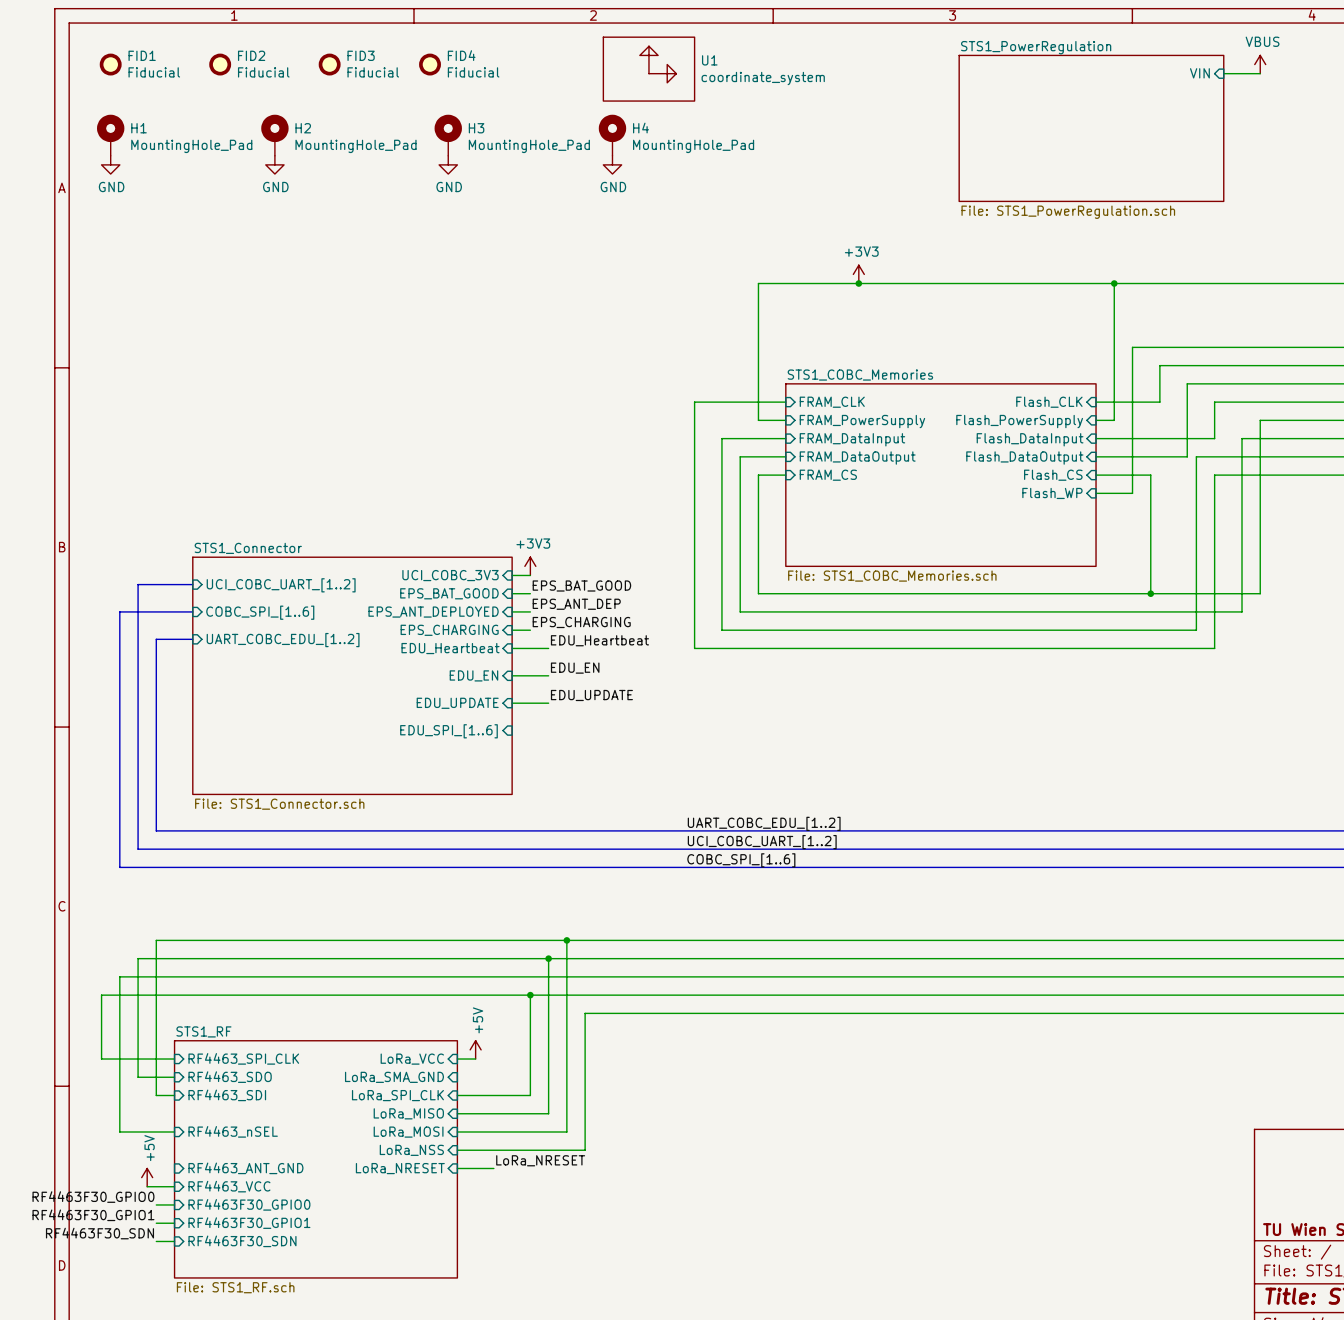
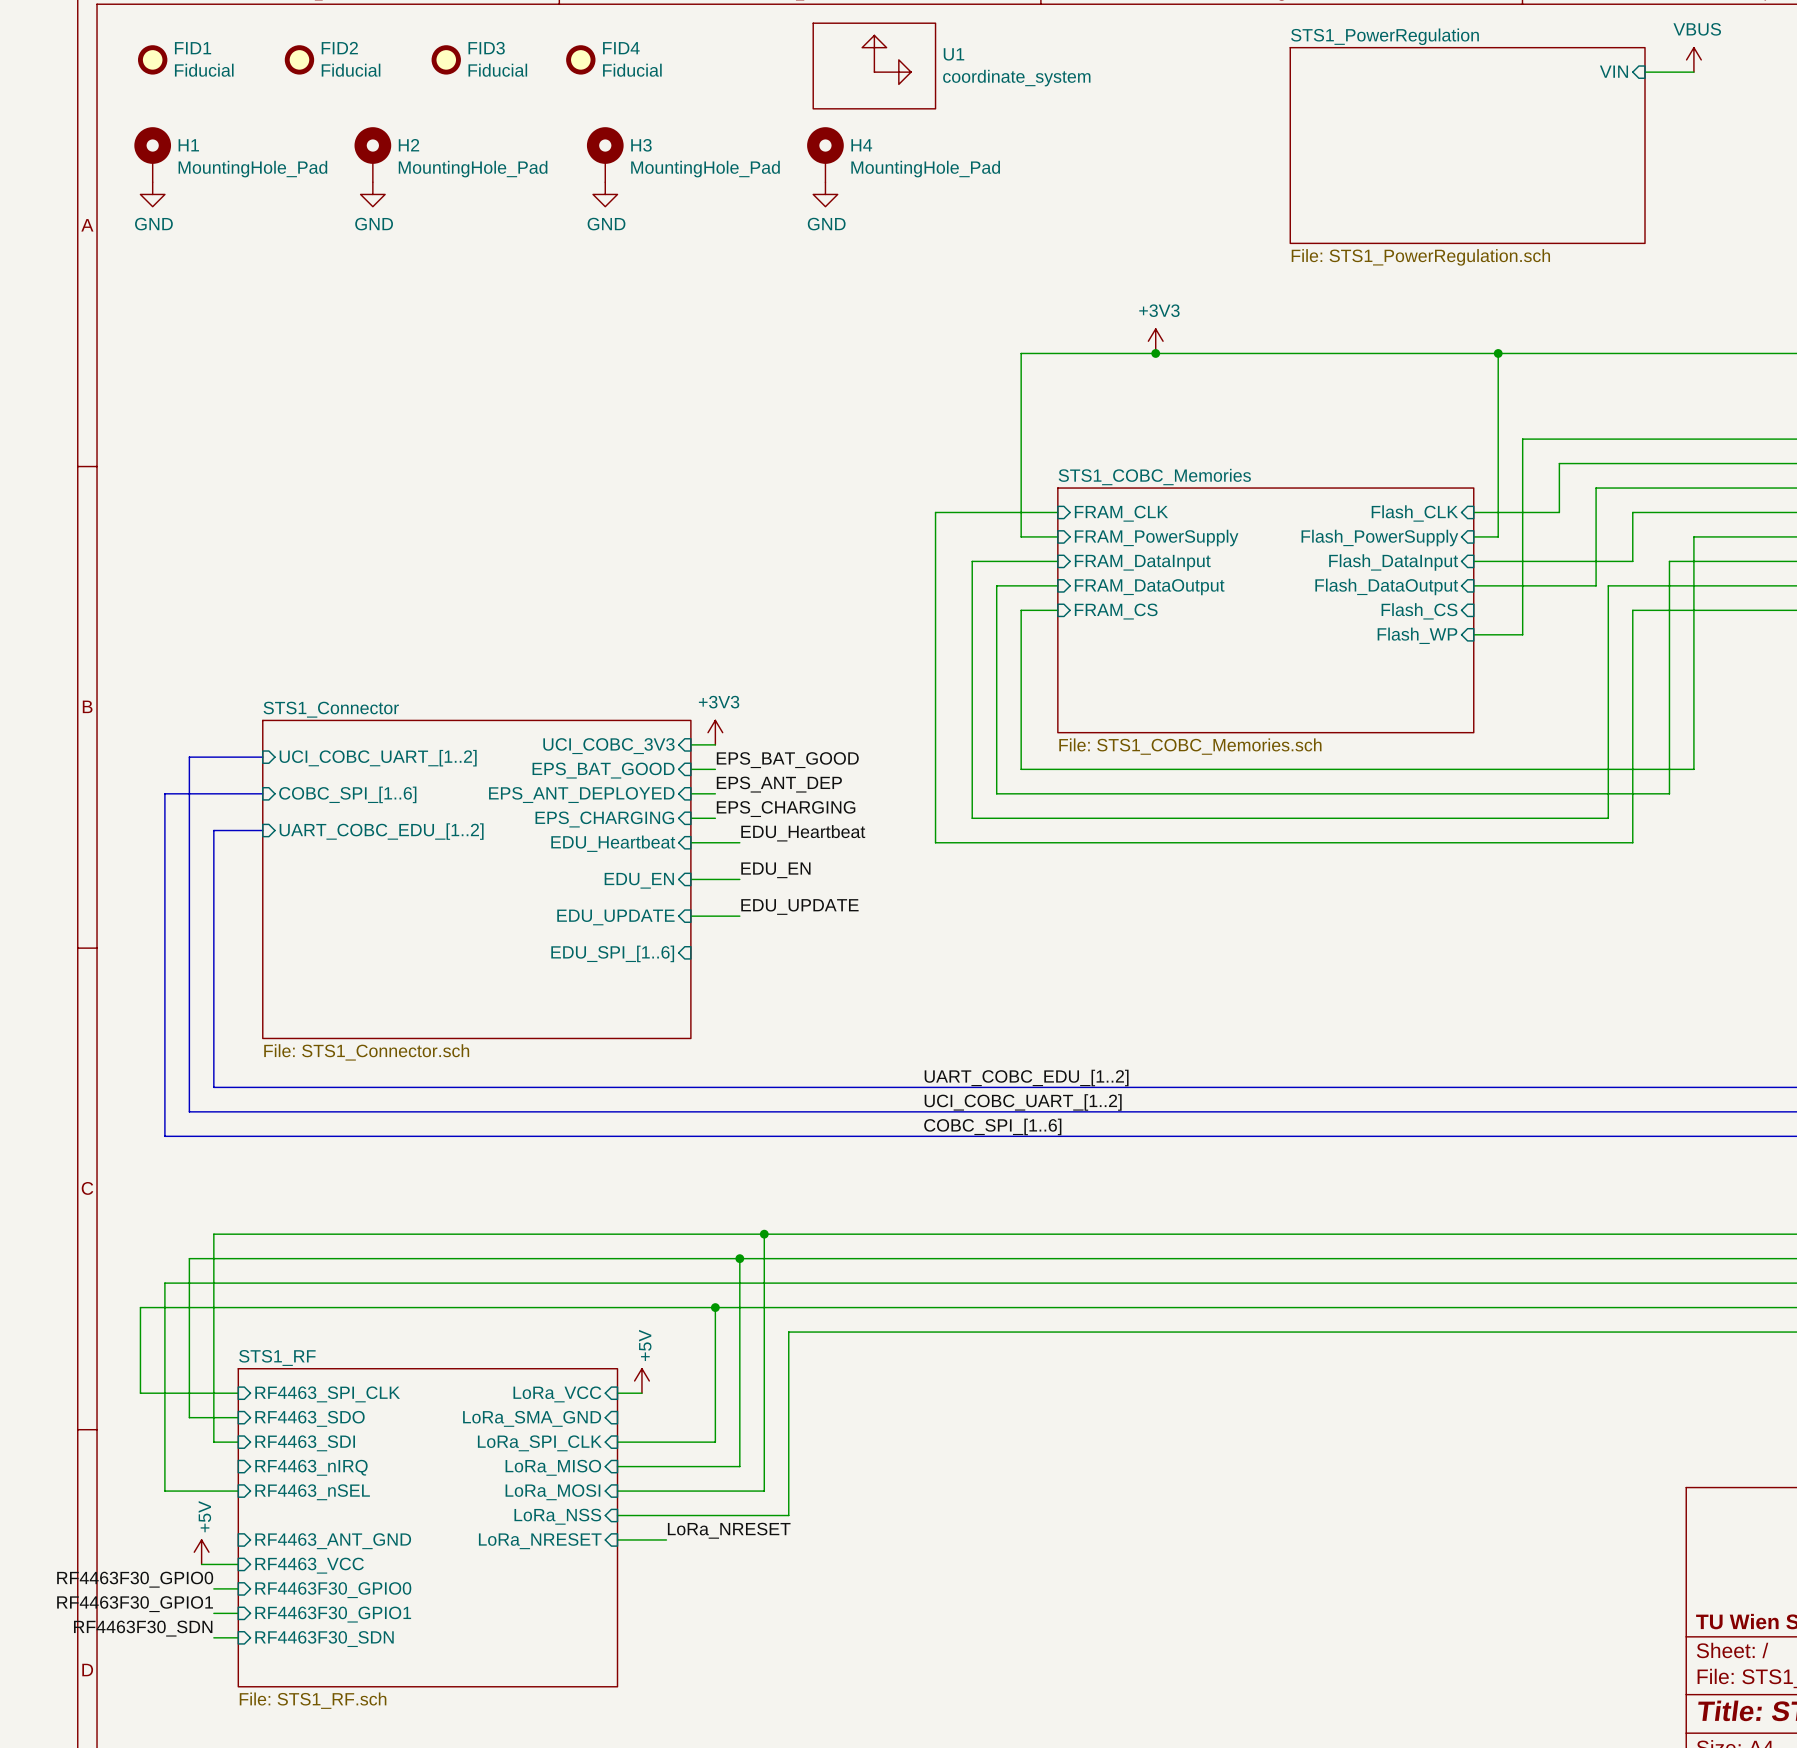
wire: (1096, 475) (1150, 475) (1150, 593) -> none
junction: (1150, 593) -> none
sheet pin: none -> RF4463_nIRQ (311, 1467)

